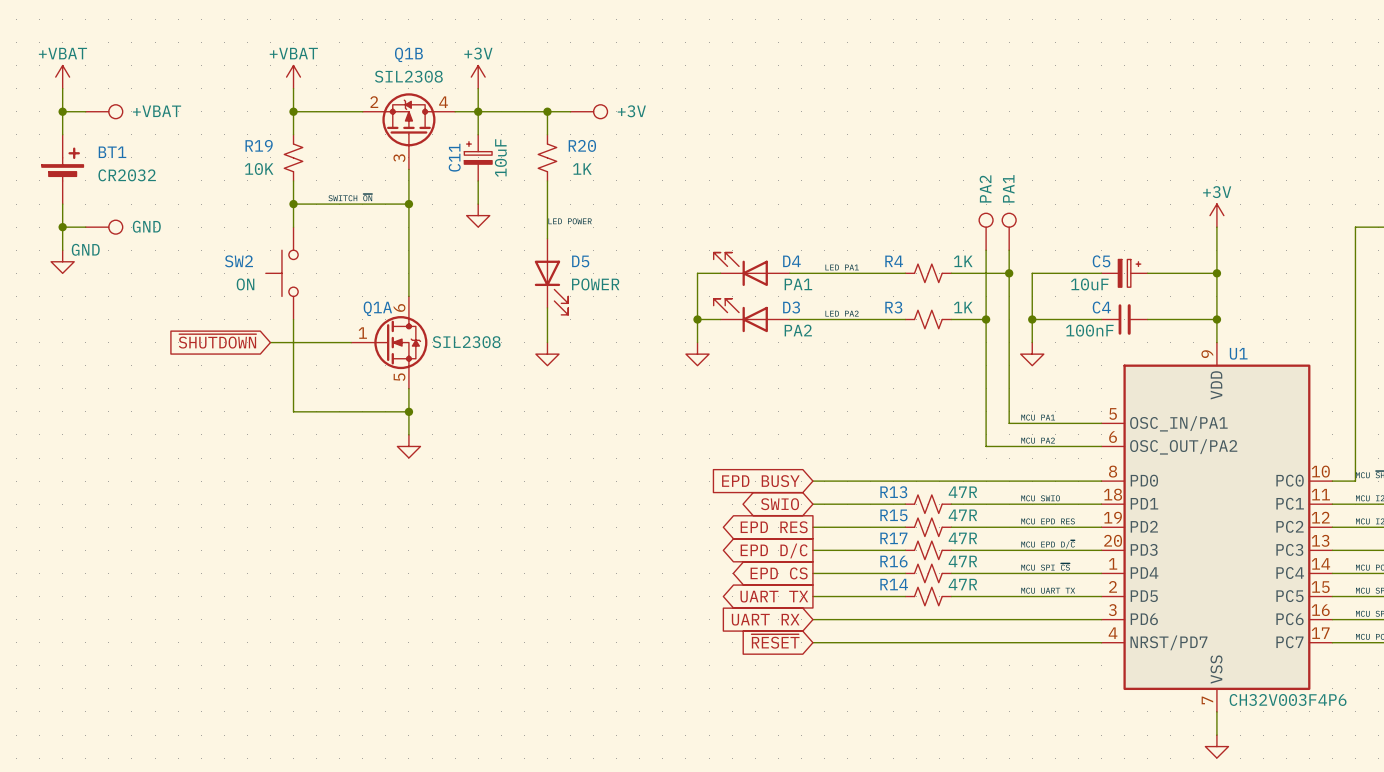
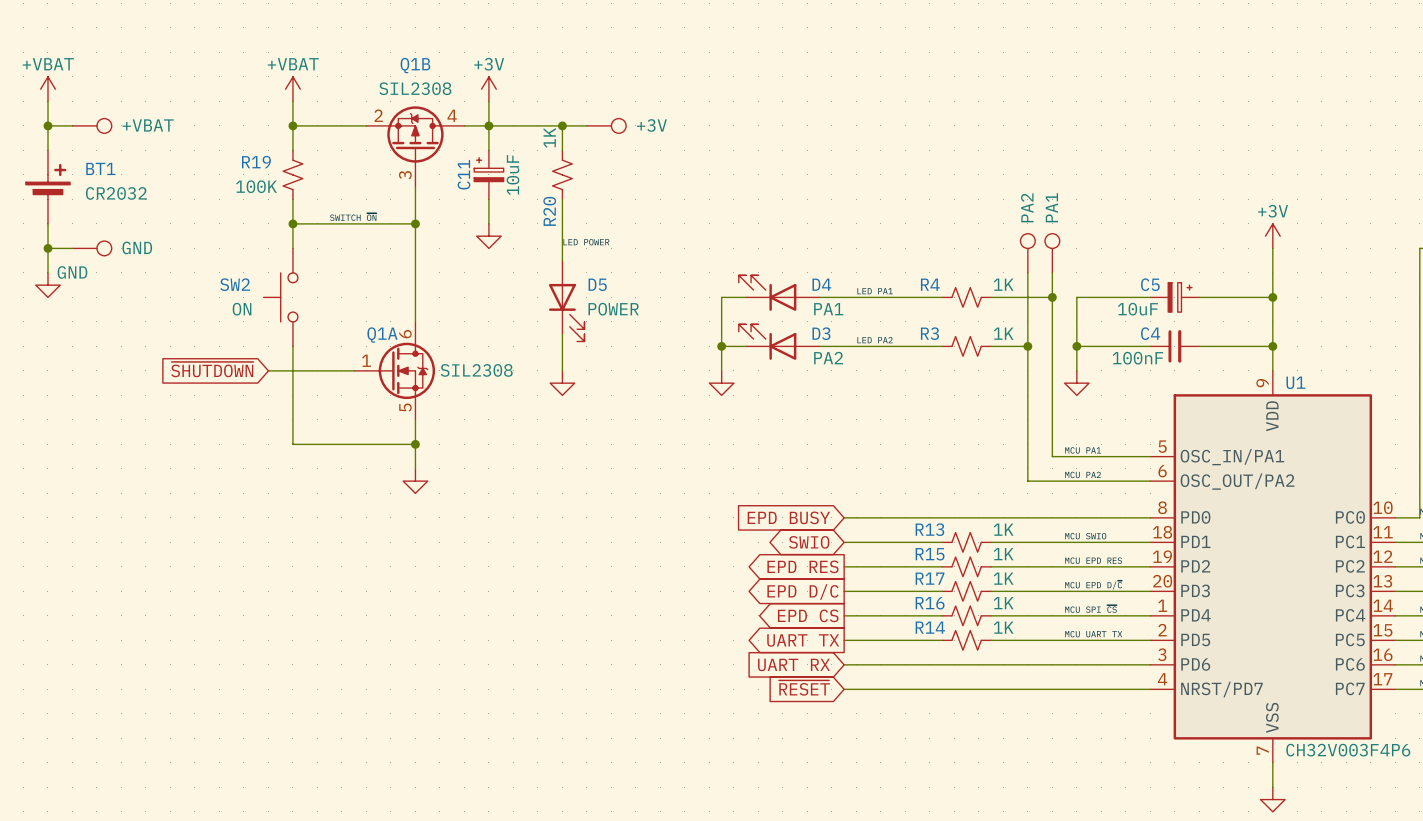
R20 name rotation: 0° (582, 145) -> 90° counterclockwise (549, 211)
R20 name position: R20 (582, 145) -> R20 (549, 211)
R19 value: 10K (259, 169) -> 100K (256, 186)
R20 value rotation: 0° (582, 169) -> 90° counterclockwise (549, 137)
R20 value position: 1K (582, 169) -> 1K (549, 137)
R13 value: 47R (962, 492) -> 1K (1003, 529)
R15 value: 47R (962, 515) -> 1K (1003, 554)
R17 value: 47R (962, 538) -> 1K (1003, 578)
R16 value: 47R (962, 561) -> 1K (1003, 603)
R14 value: 47R (962, 584) -> 1K (1003, 627)

